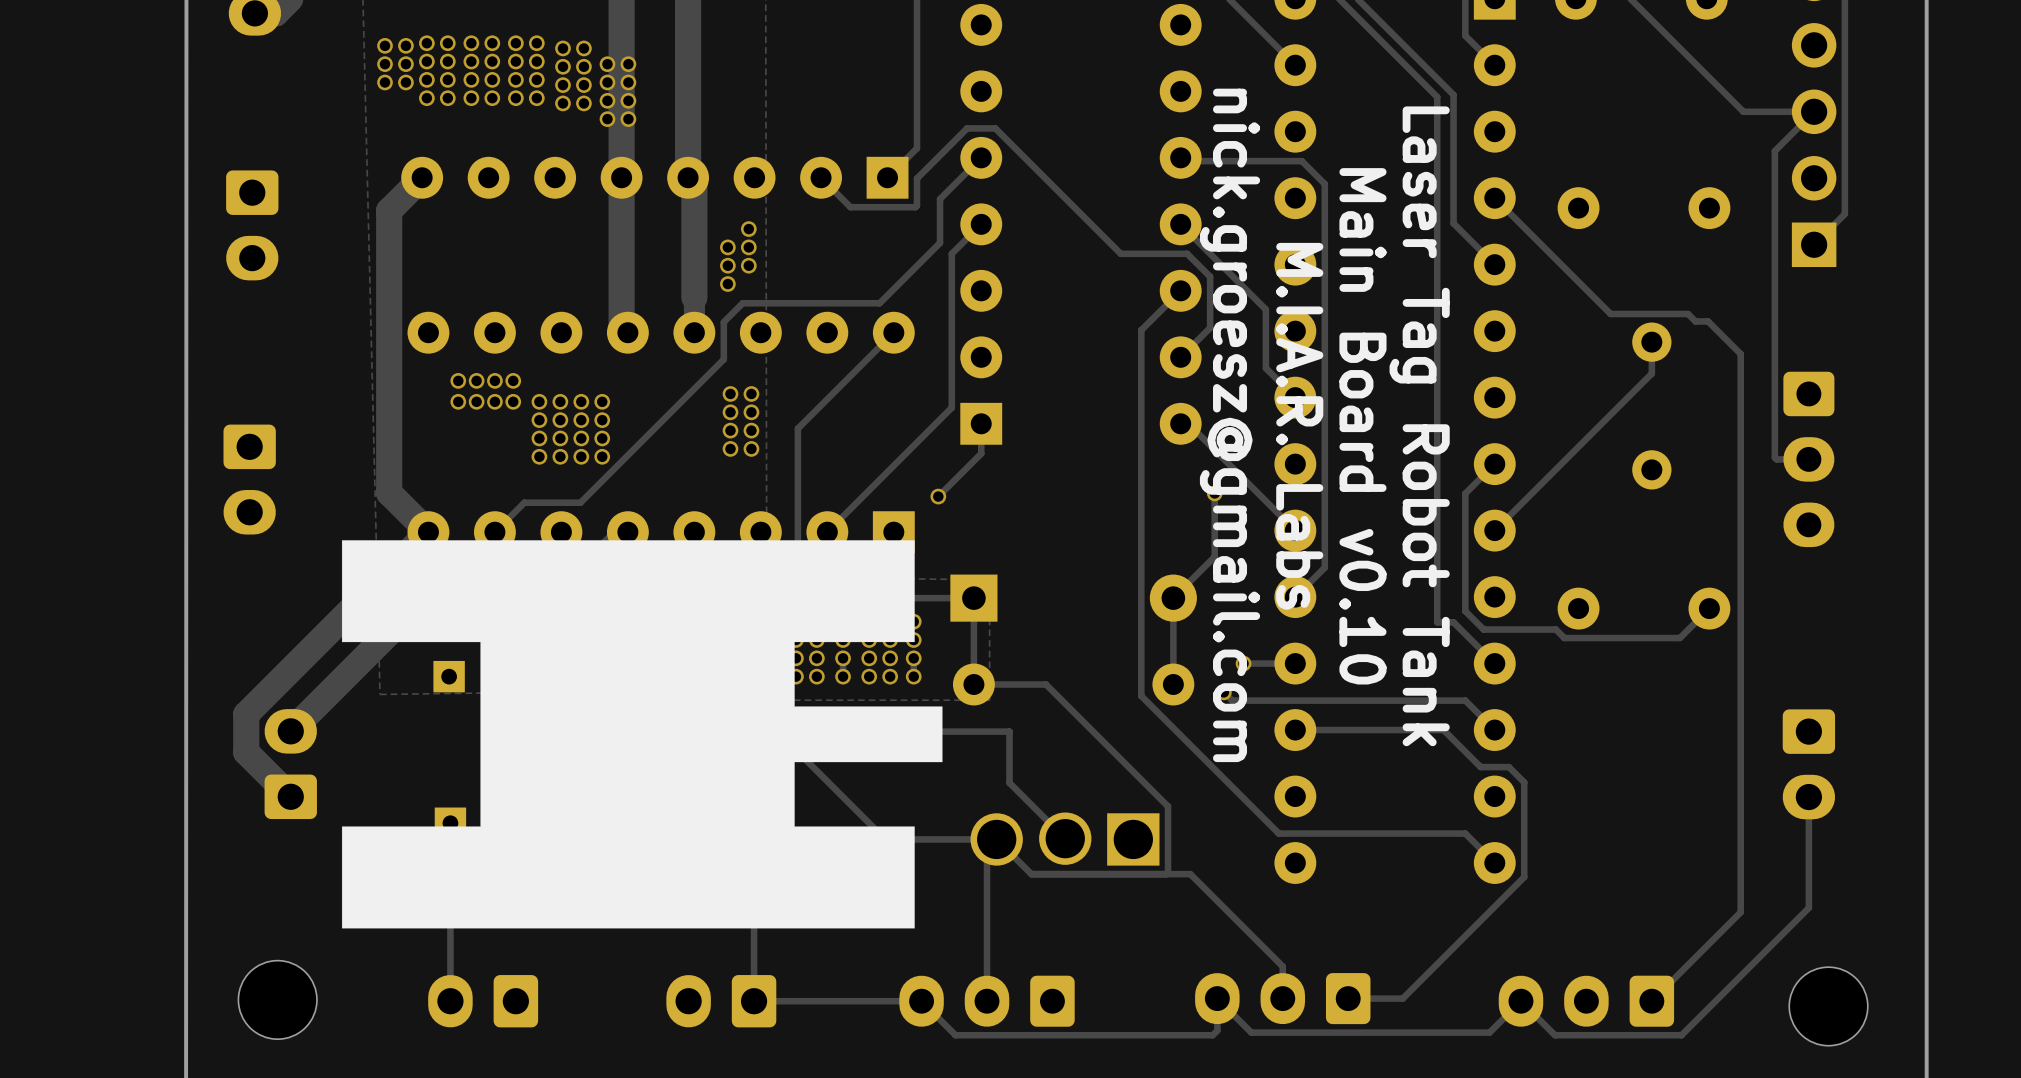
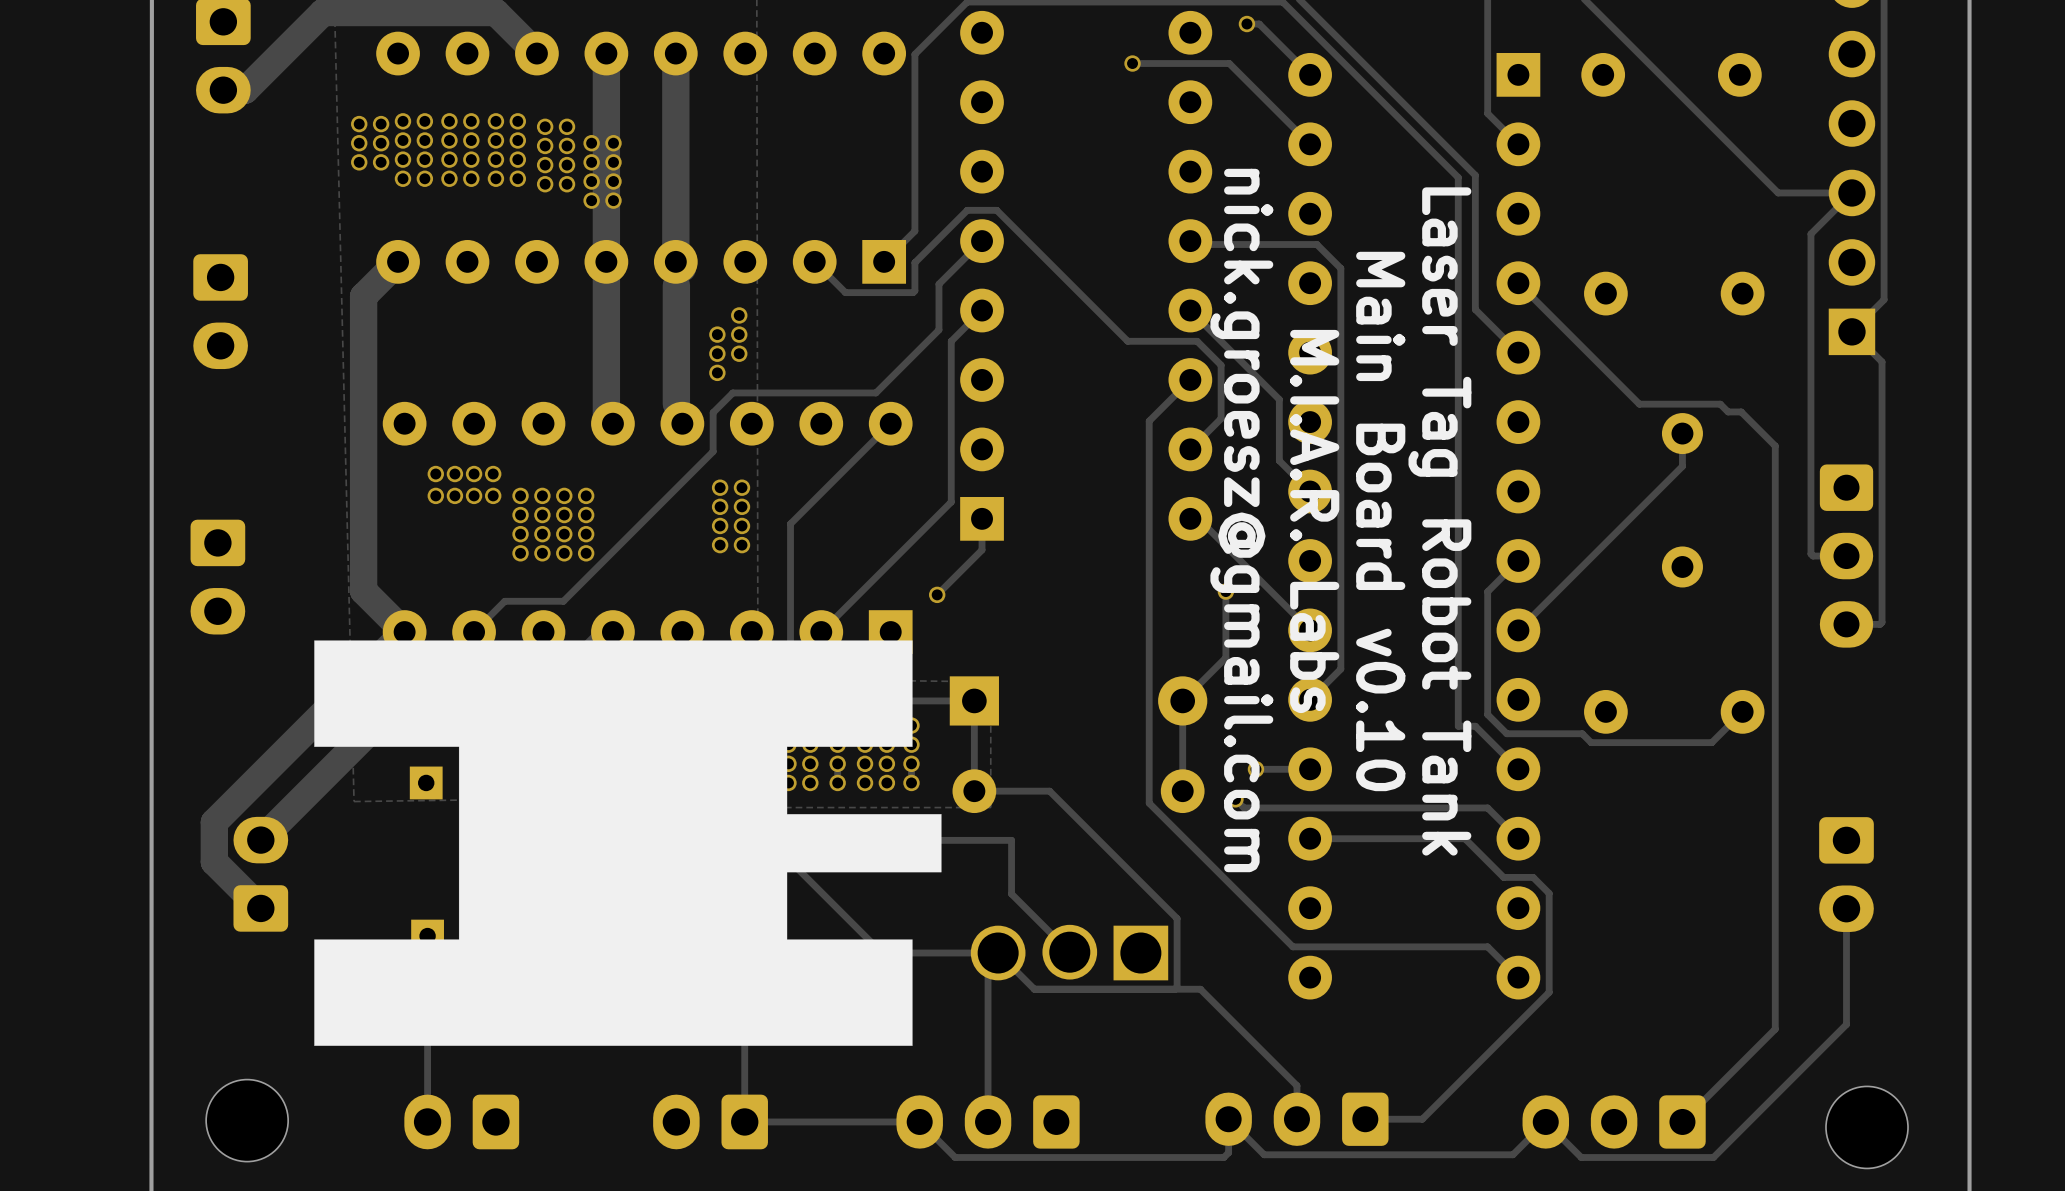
track: (694, 184) (694, 332) -> none
track: none -> (676, 285) (676, 404)
track: none -> (1851, 331) (1882, 361) (1882, 622) (1879, 624) (1846, 624)

